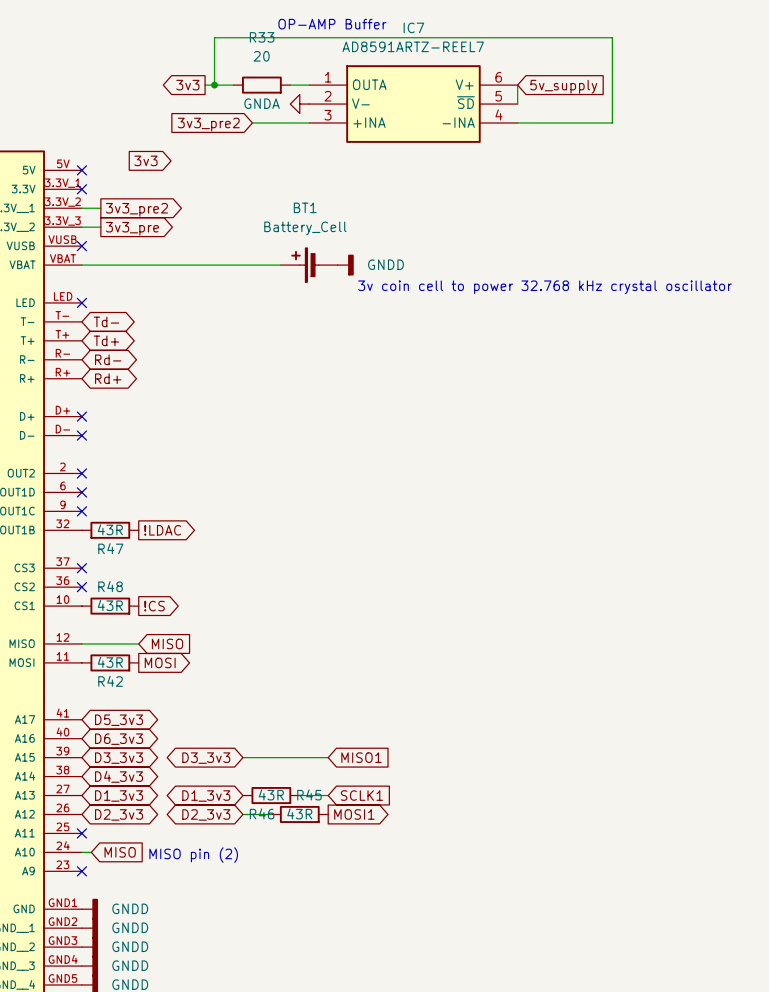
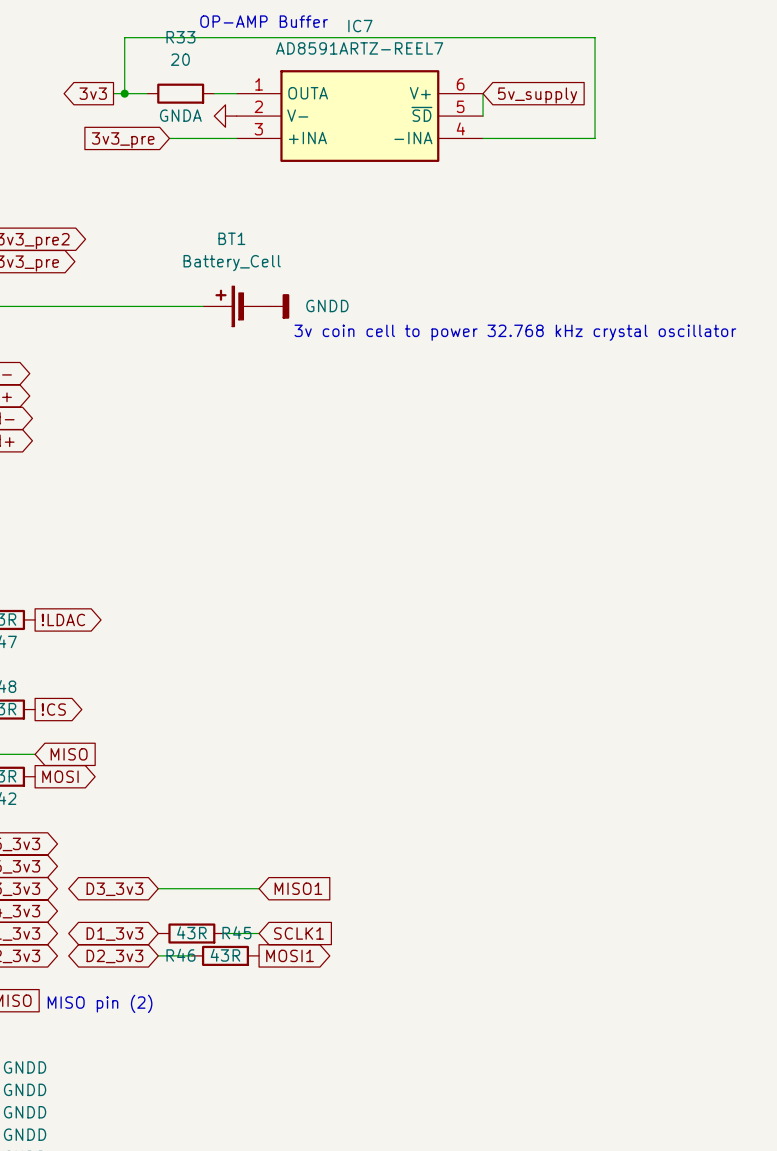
global label: 3v3_pre2 (208, 124) -> 3v3_pre (123, 140)
global label: 3v3 (145, 160) -> none

